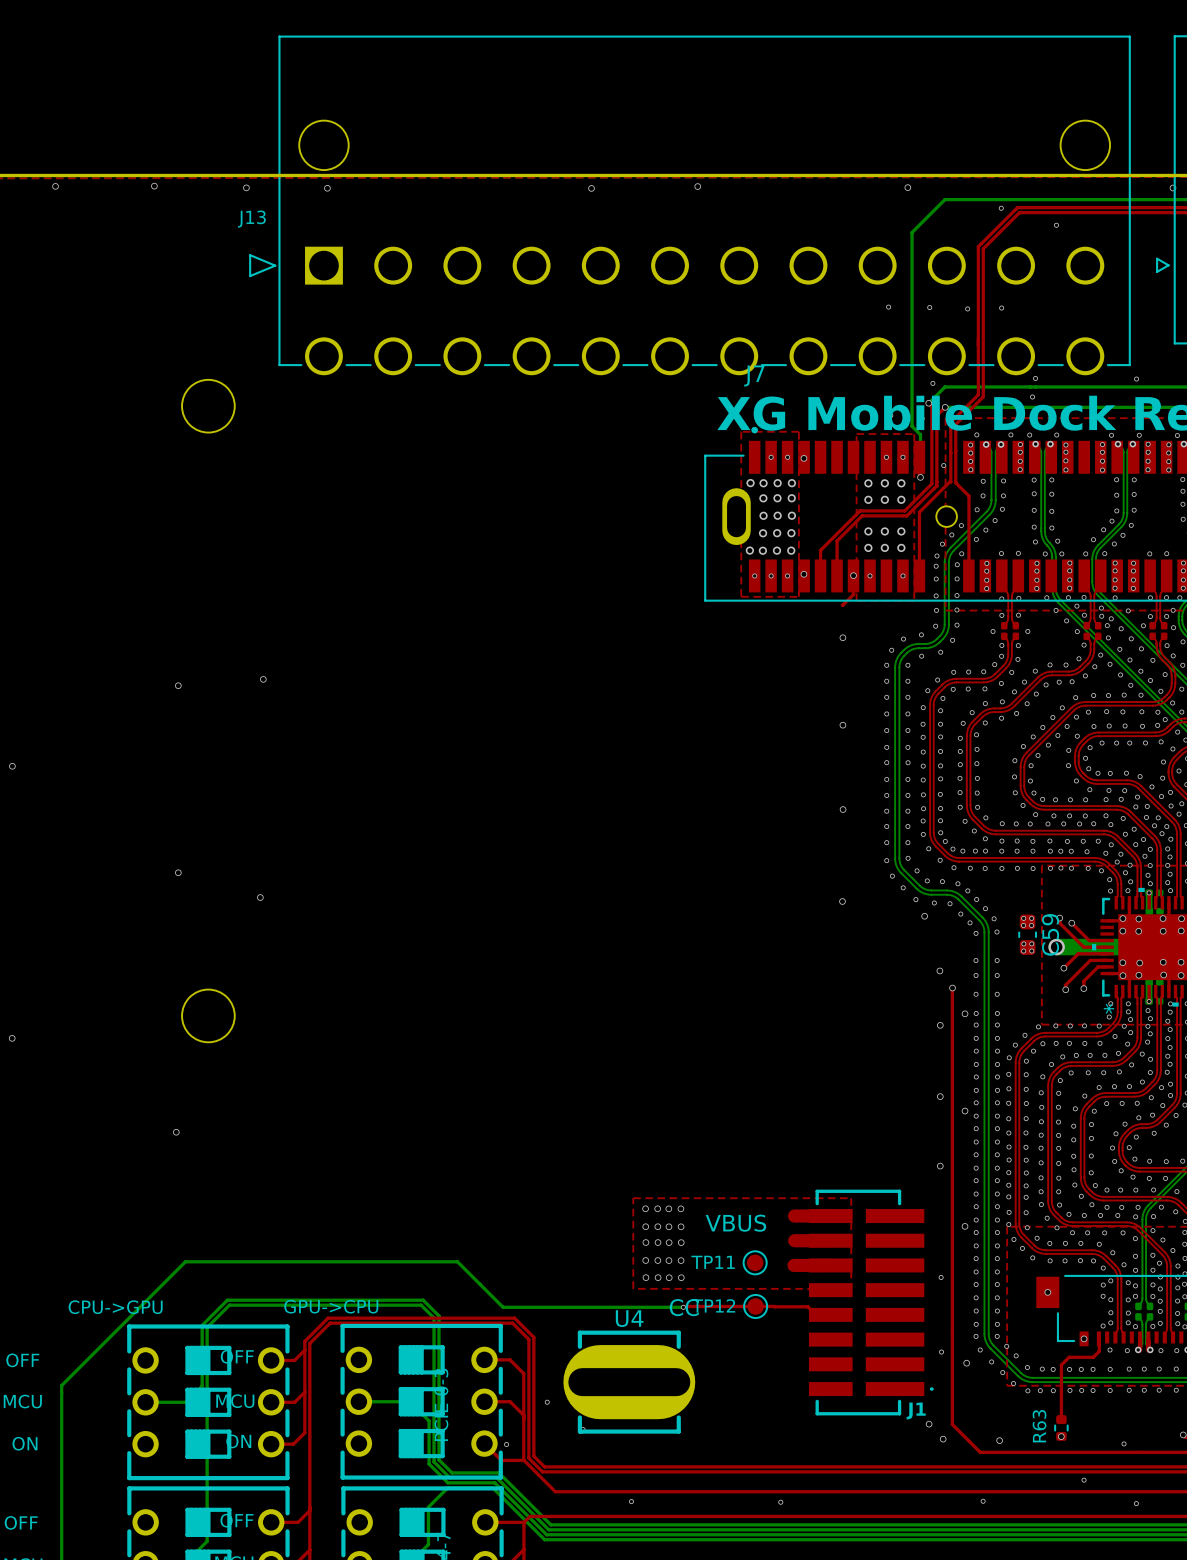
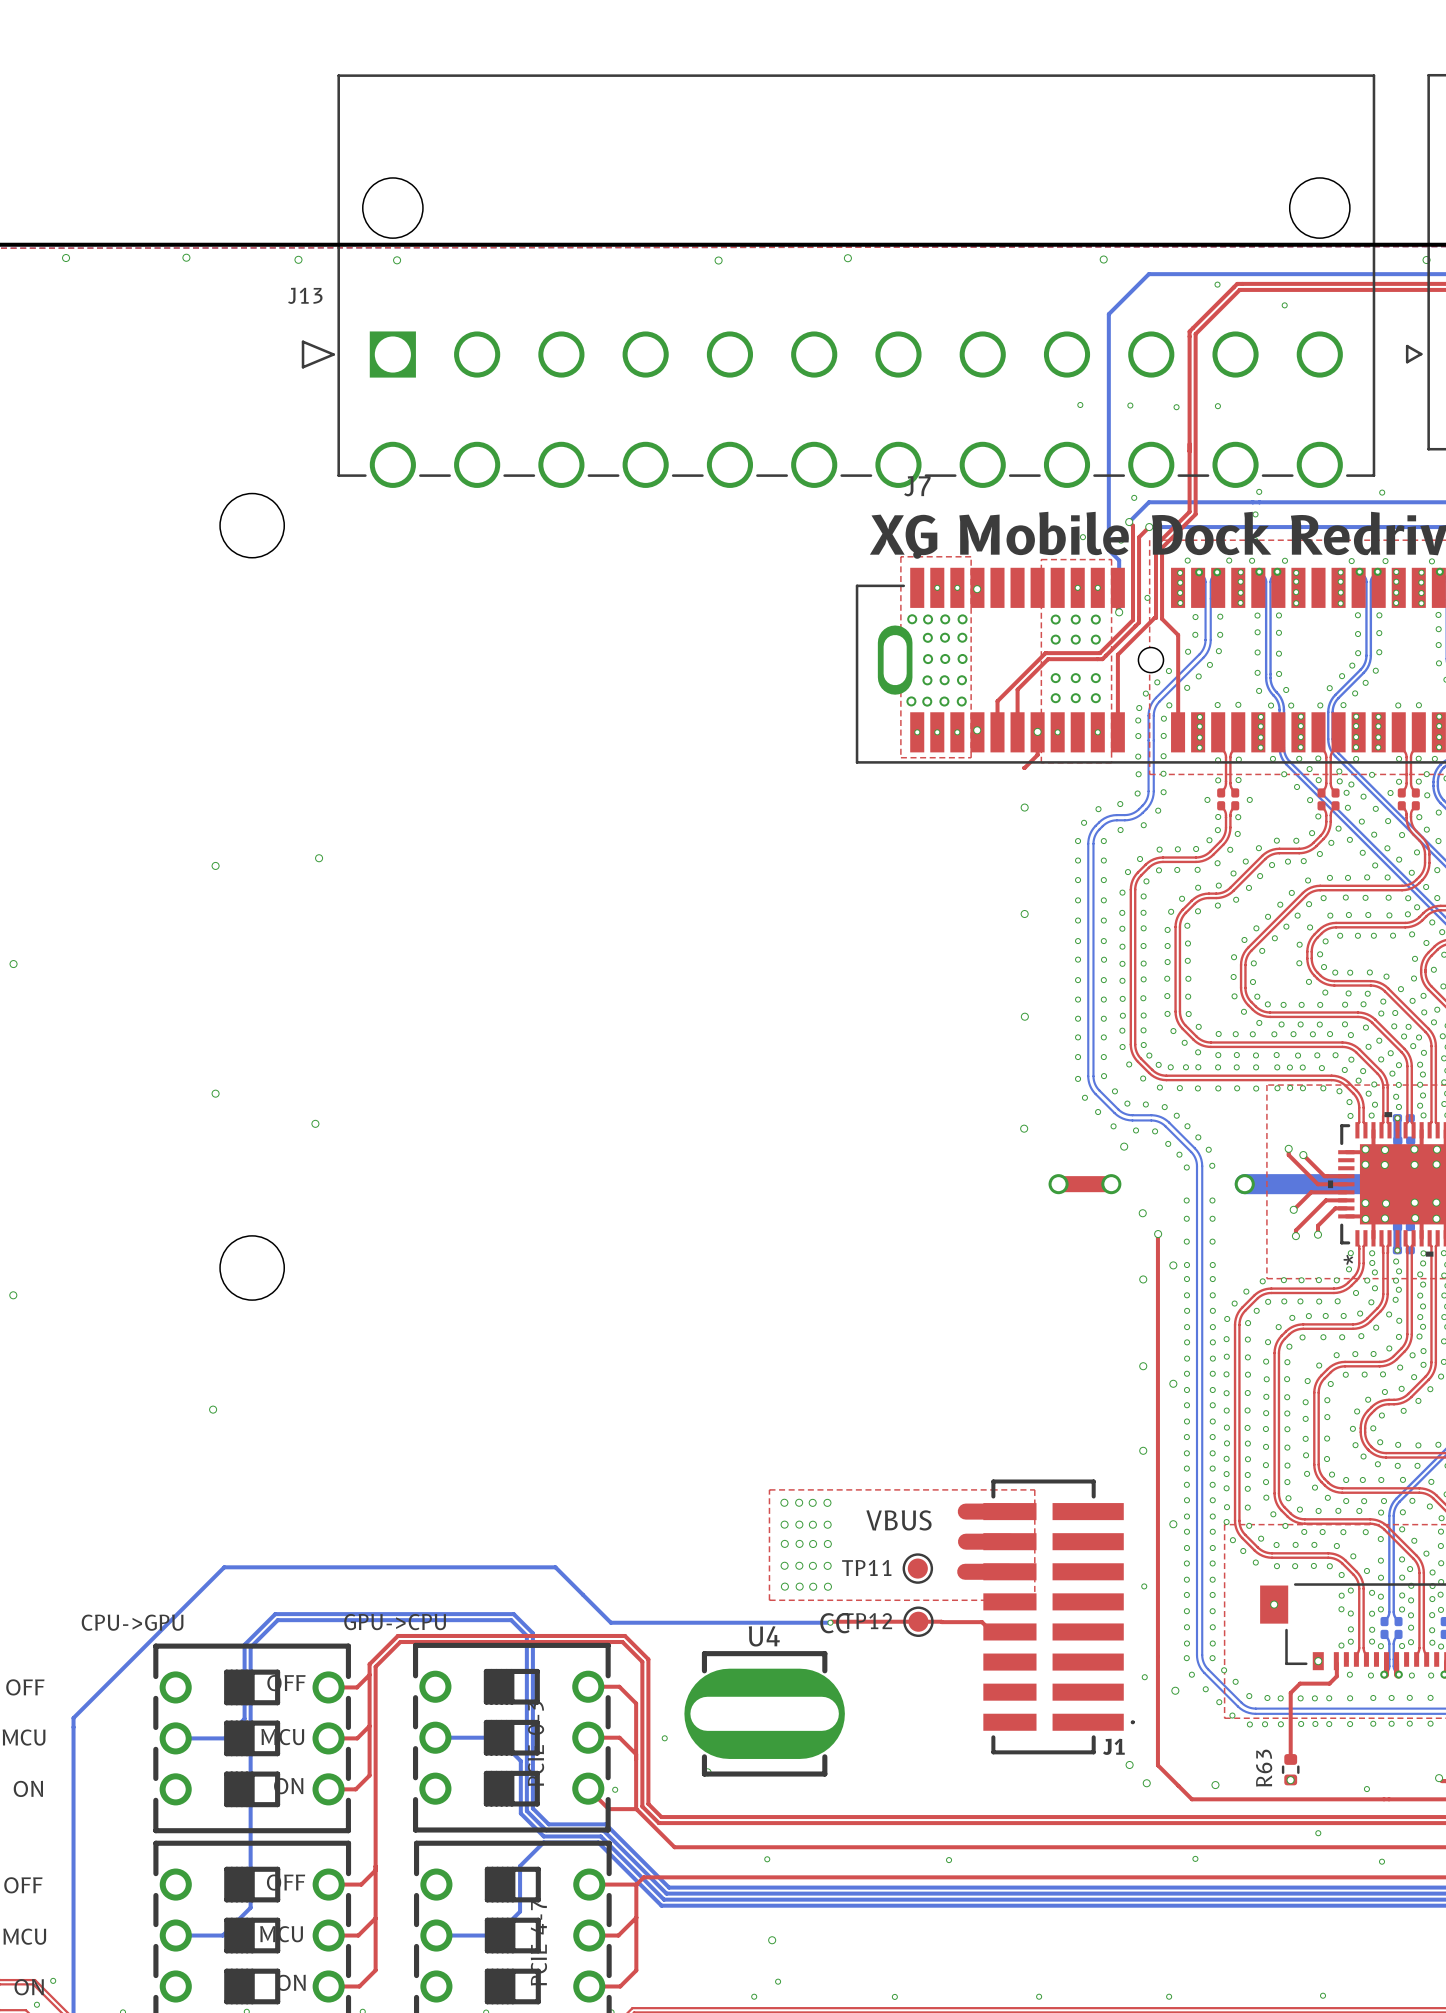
via: (1023, 918) -> none
via: (1031, 918) -> none
via: (1023, 925) -> none
via: (1031, 925) -> none
C59: (1027, 934) -> none
via: (1023, 943) -> none
via: (1031, 943) -> none
top track: none -> (1058, 1184) (1111, 1184)
via: none -> (1058, 1184)
via: none -> (1111, 1184)
bottom track: none -> (1244, 1184) (1284, 1184)
via position: (1056, 947) -> (1244, 1184)
via: (1023, 951) -> none
via: (1031, 951) -> none

